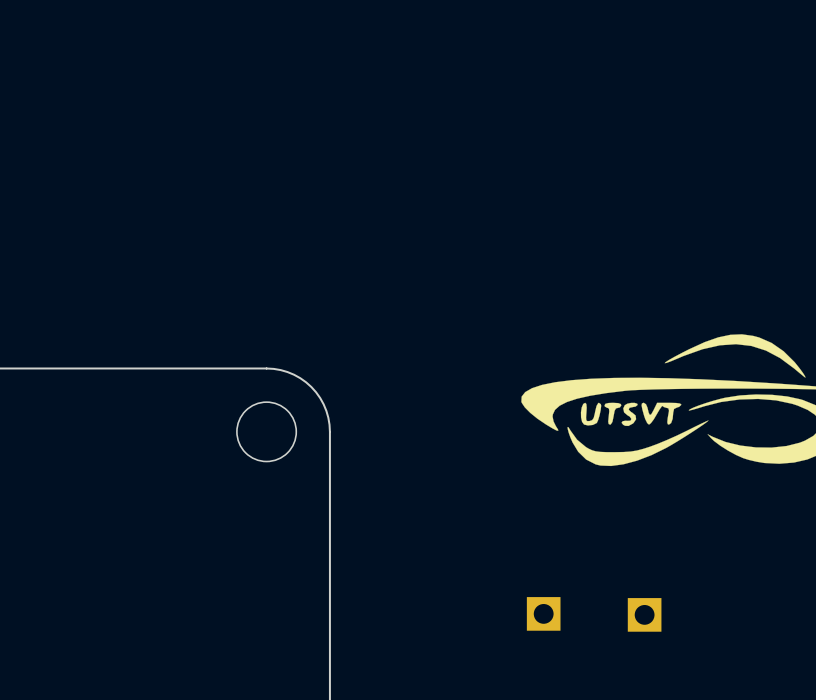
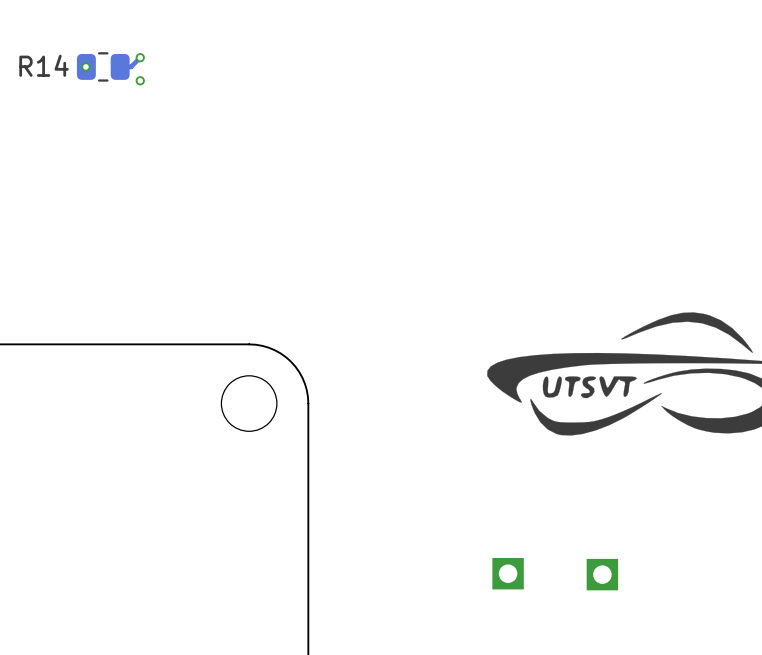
track: none -> (140, 57) (131, 66) (120, 66)
via: none -> (140, 57)
via: none -> (85, 66)
R14: none -> (103, 66)
via: none -> (140, 80)

